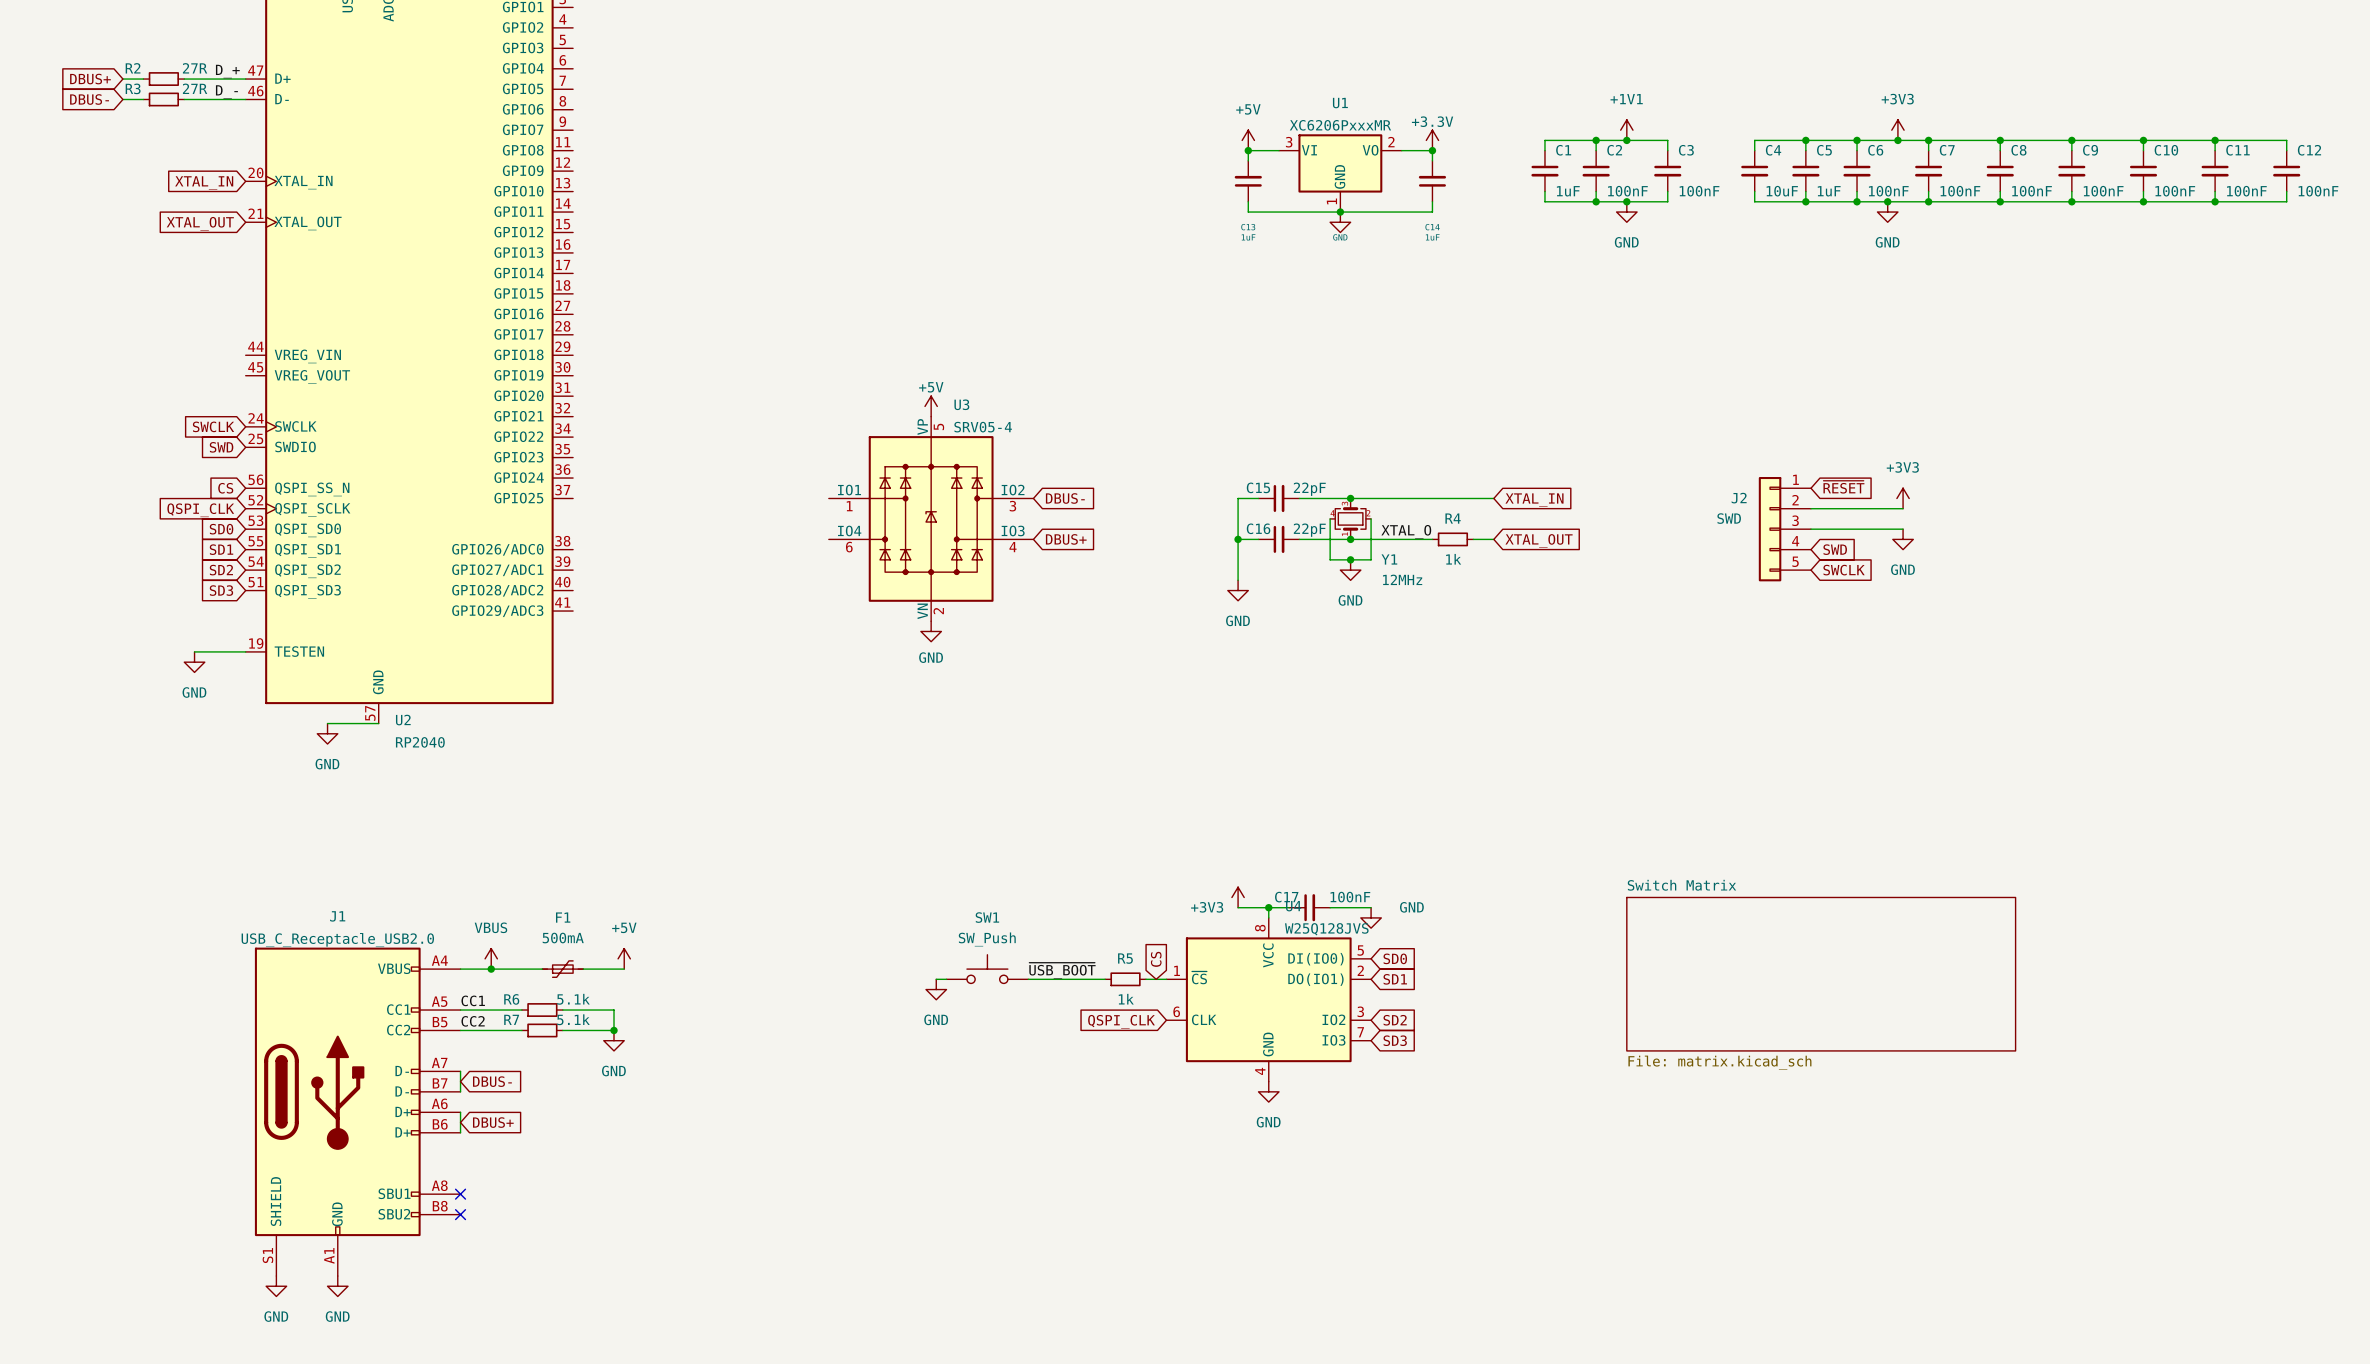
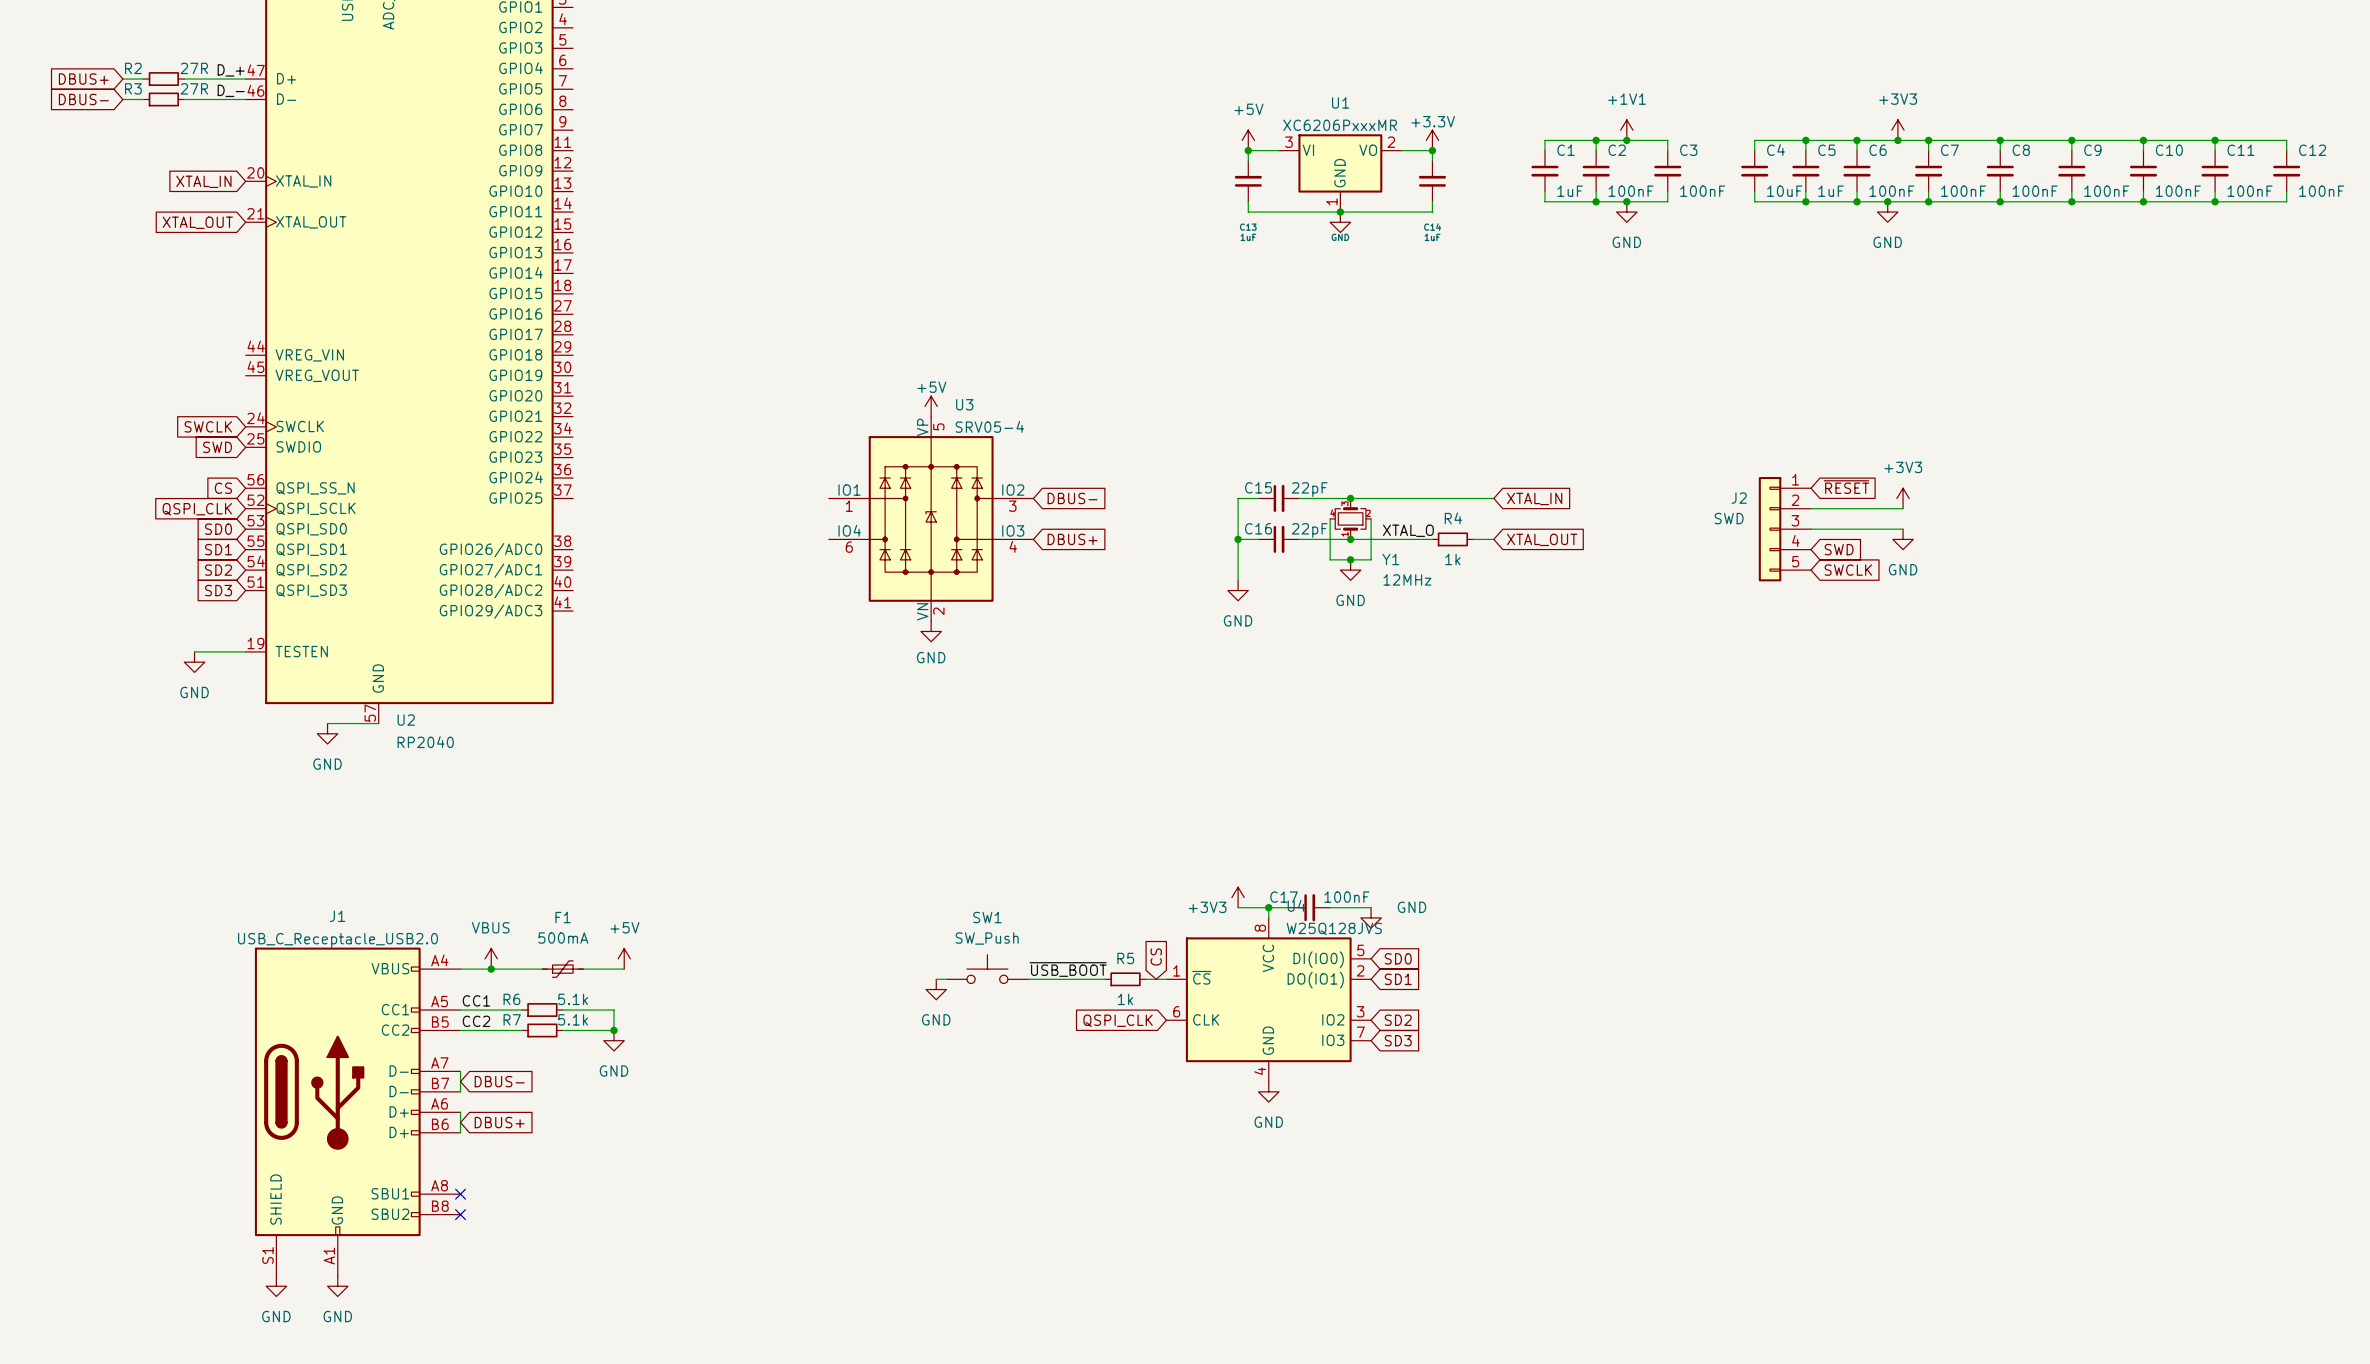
sheet Switch Matrix: File: matrix.kicad_sch (1821, 974) -> none

